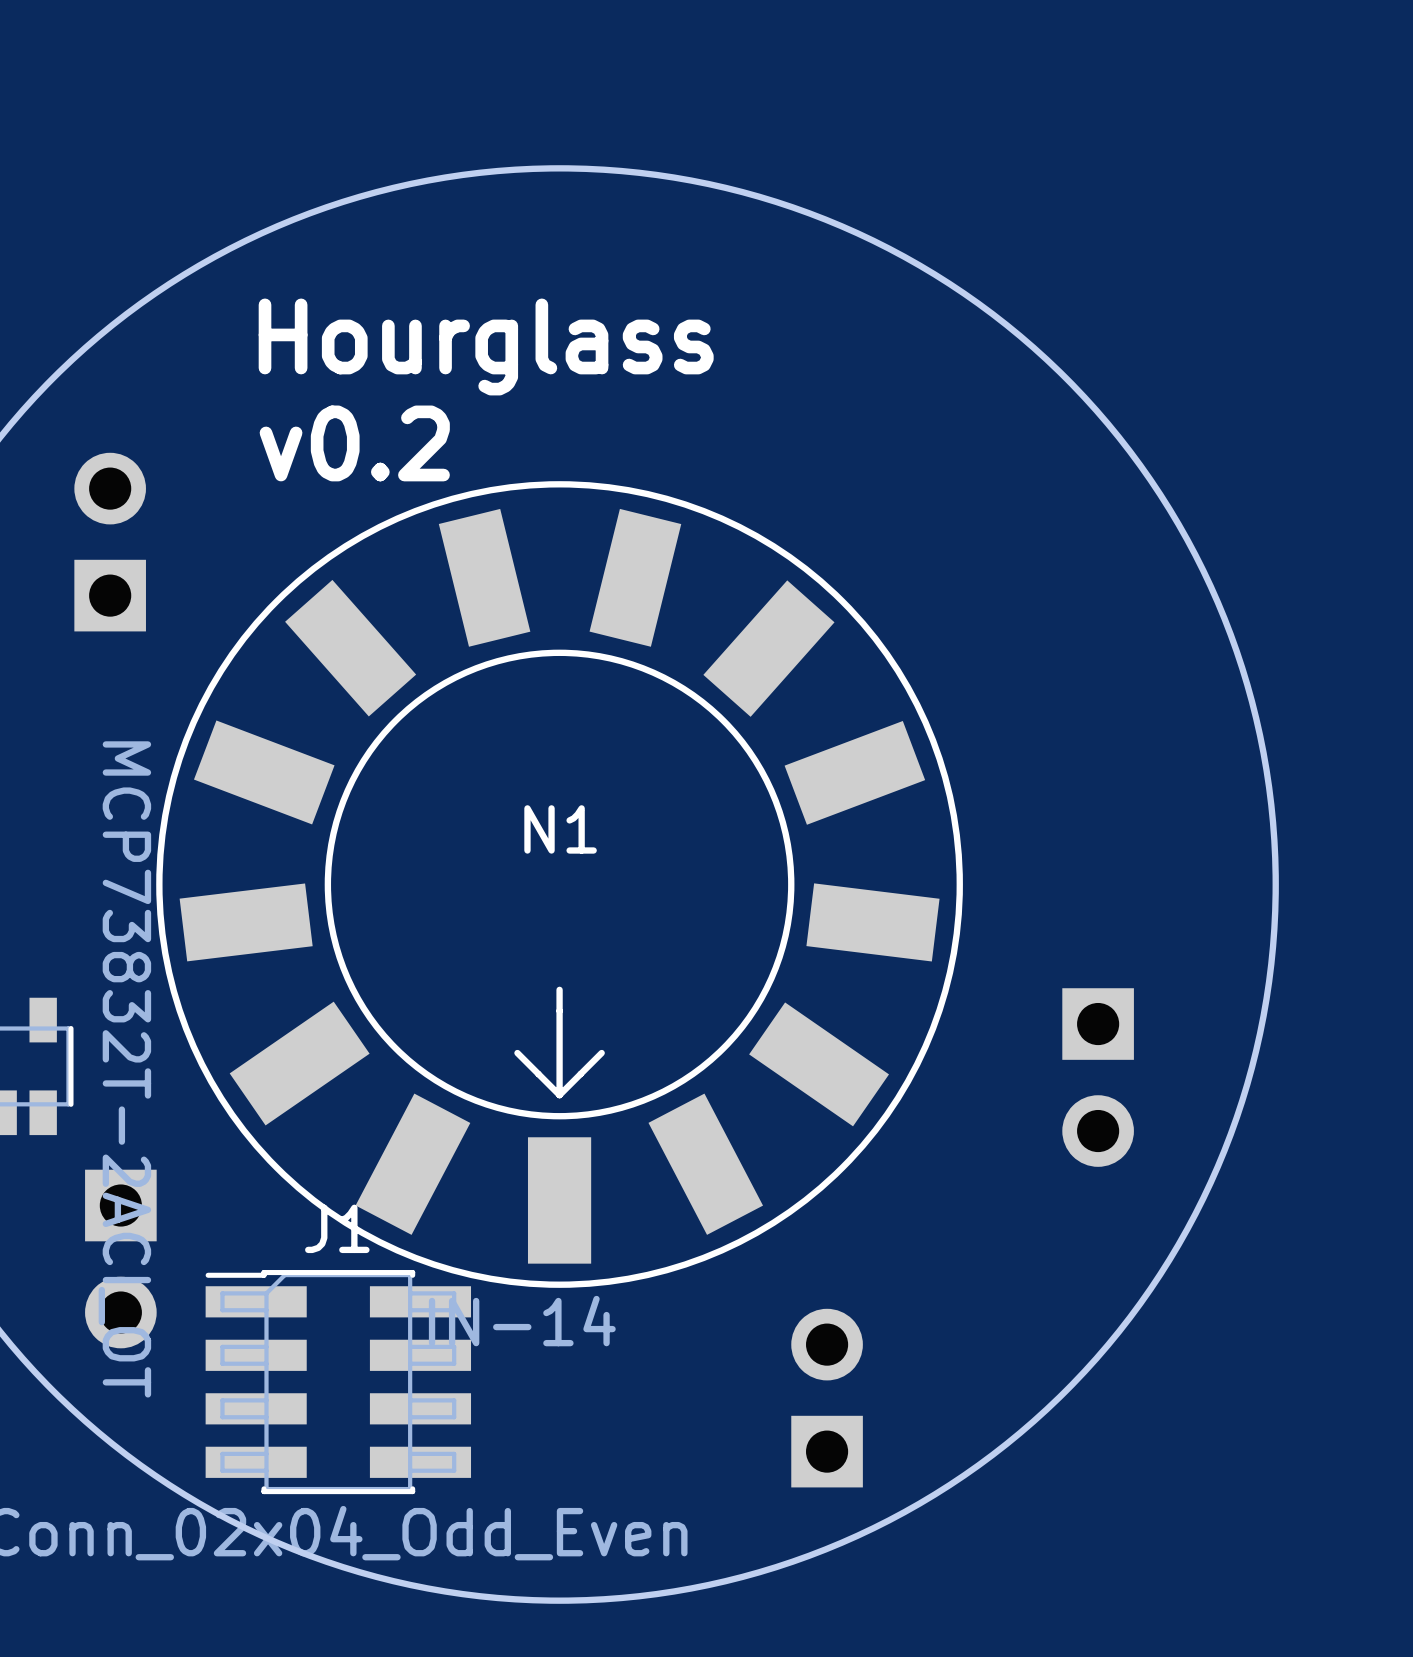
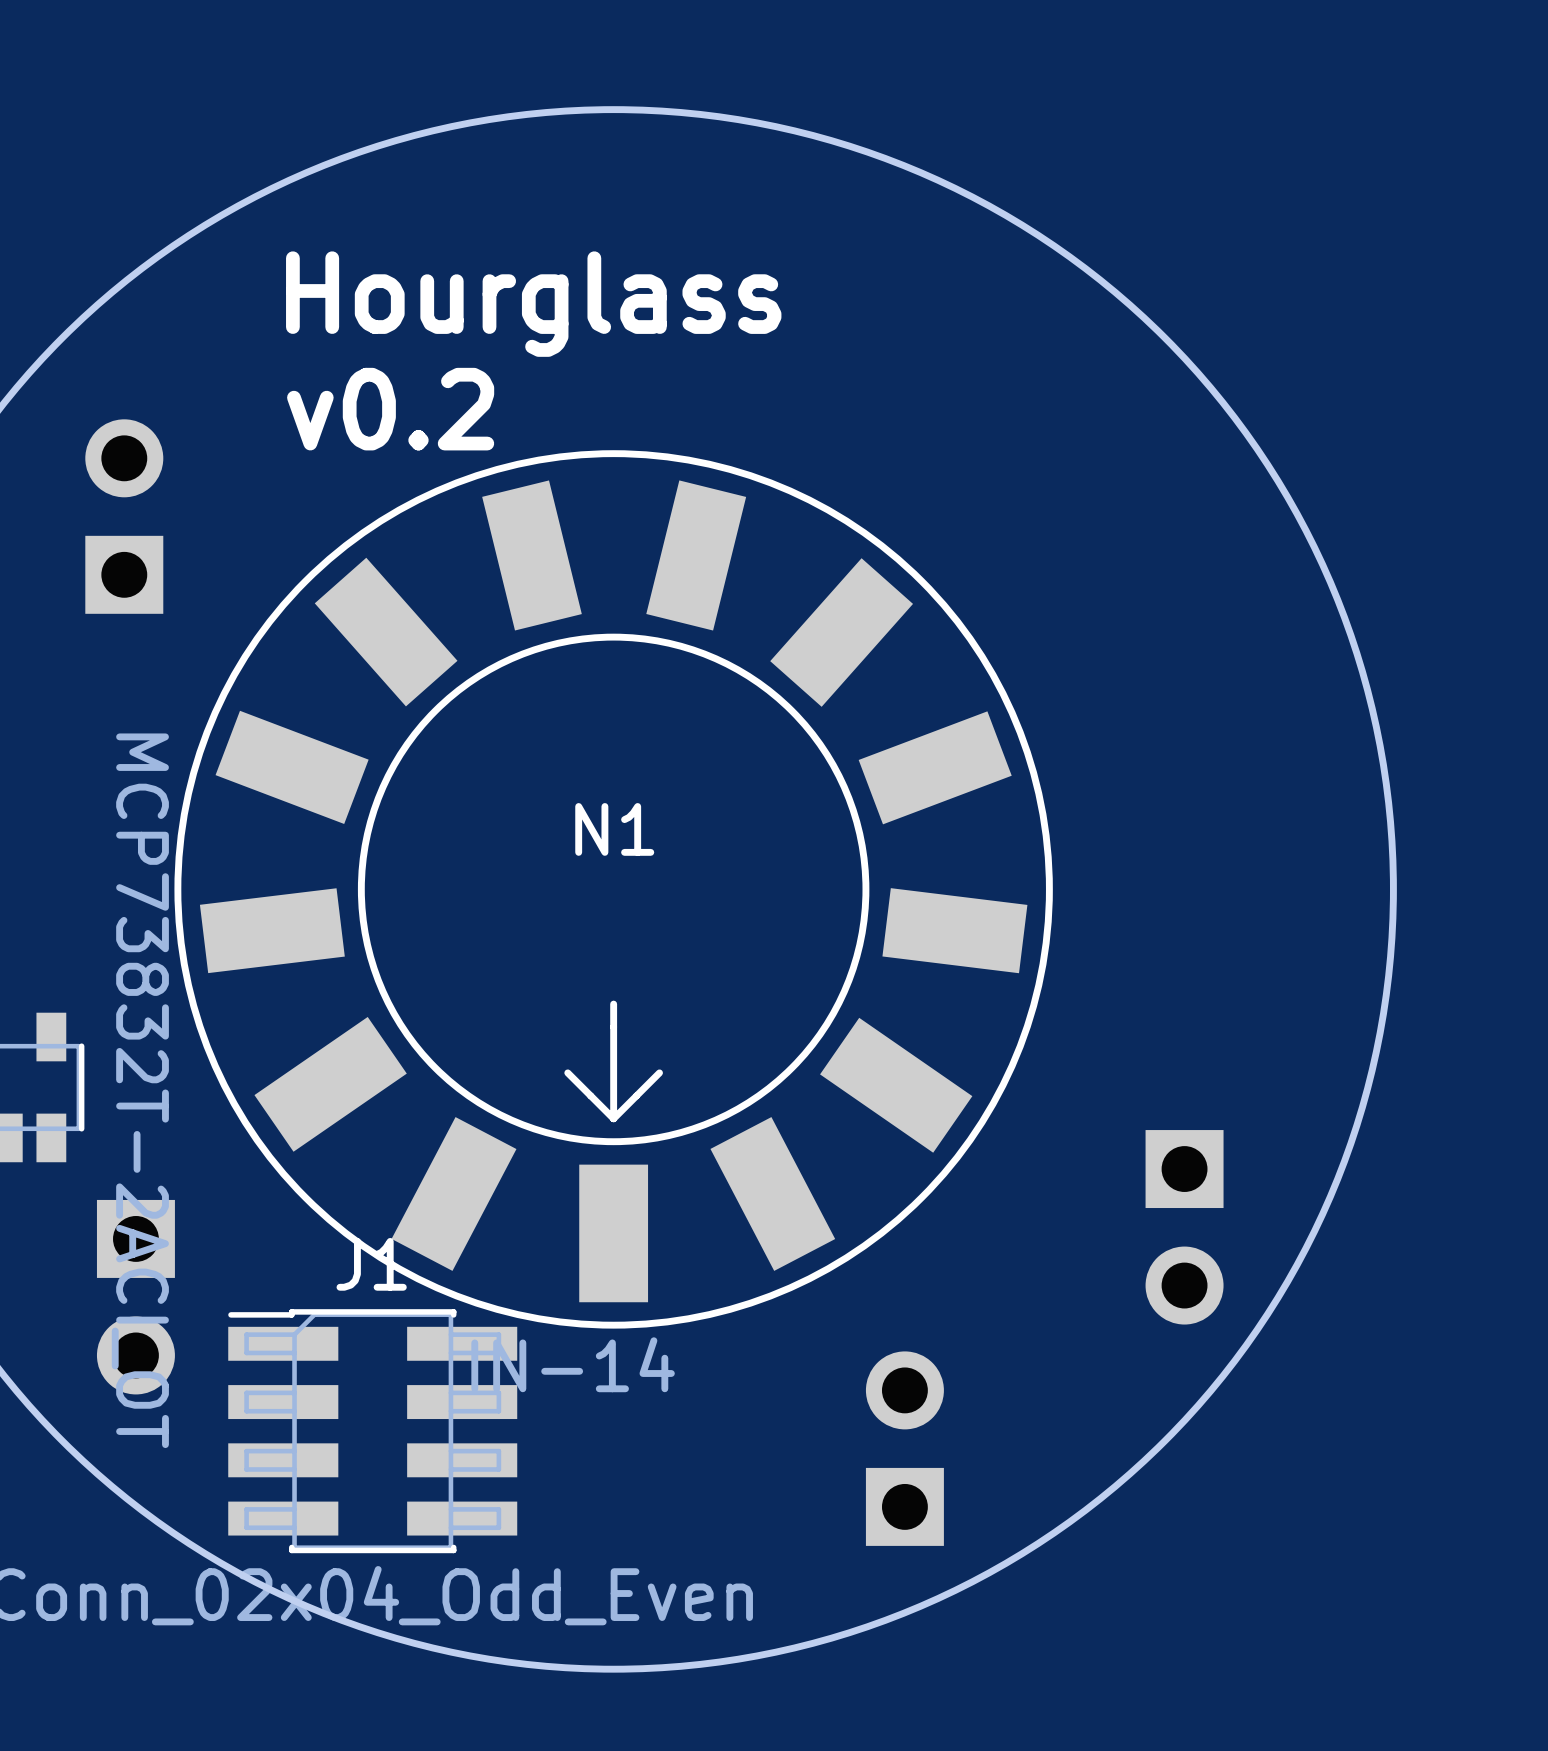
part position: (1098, 1077) -> (1184, 1227)

